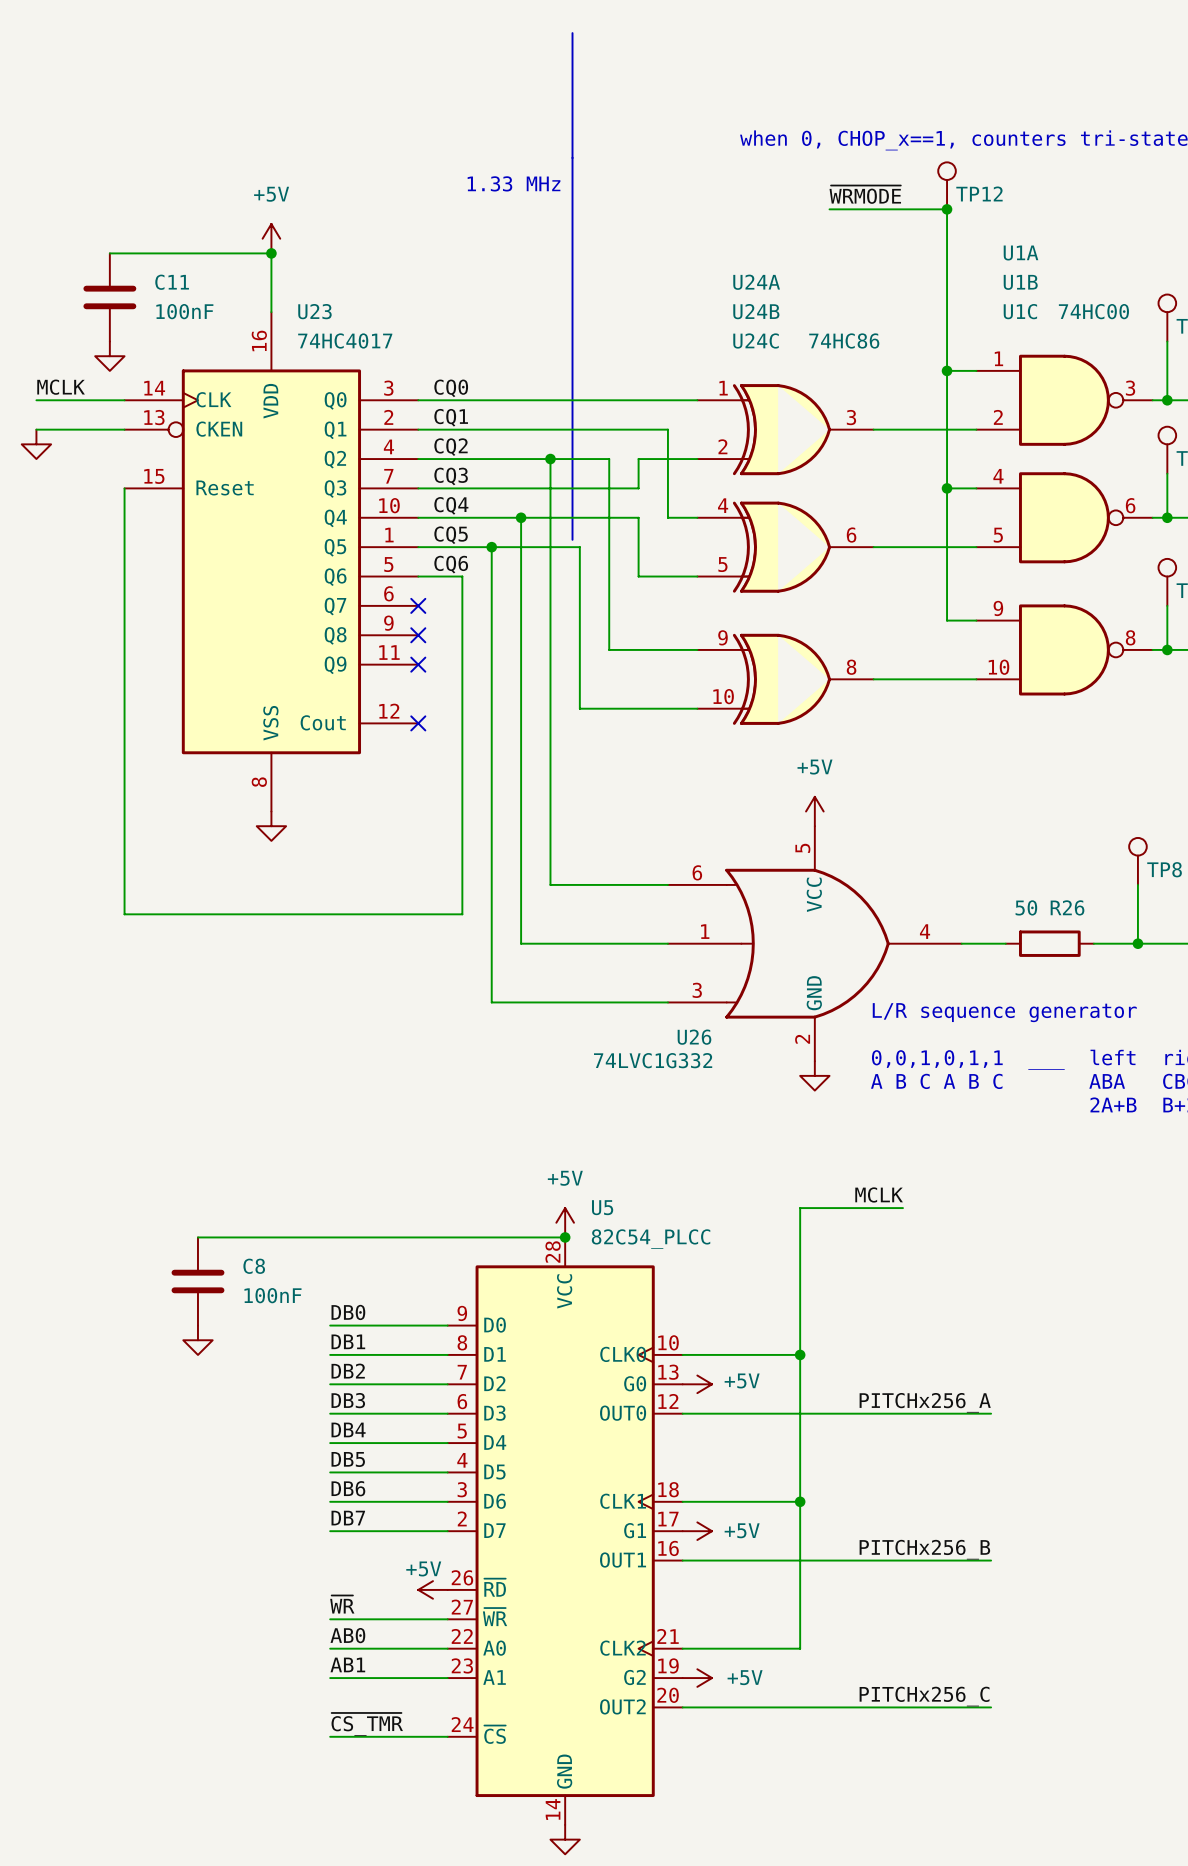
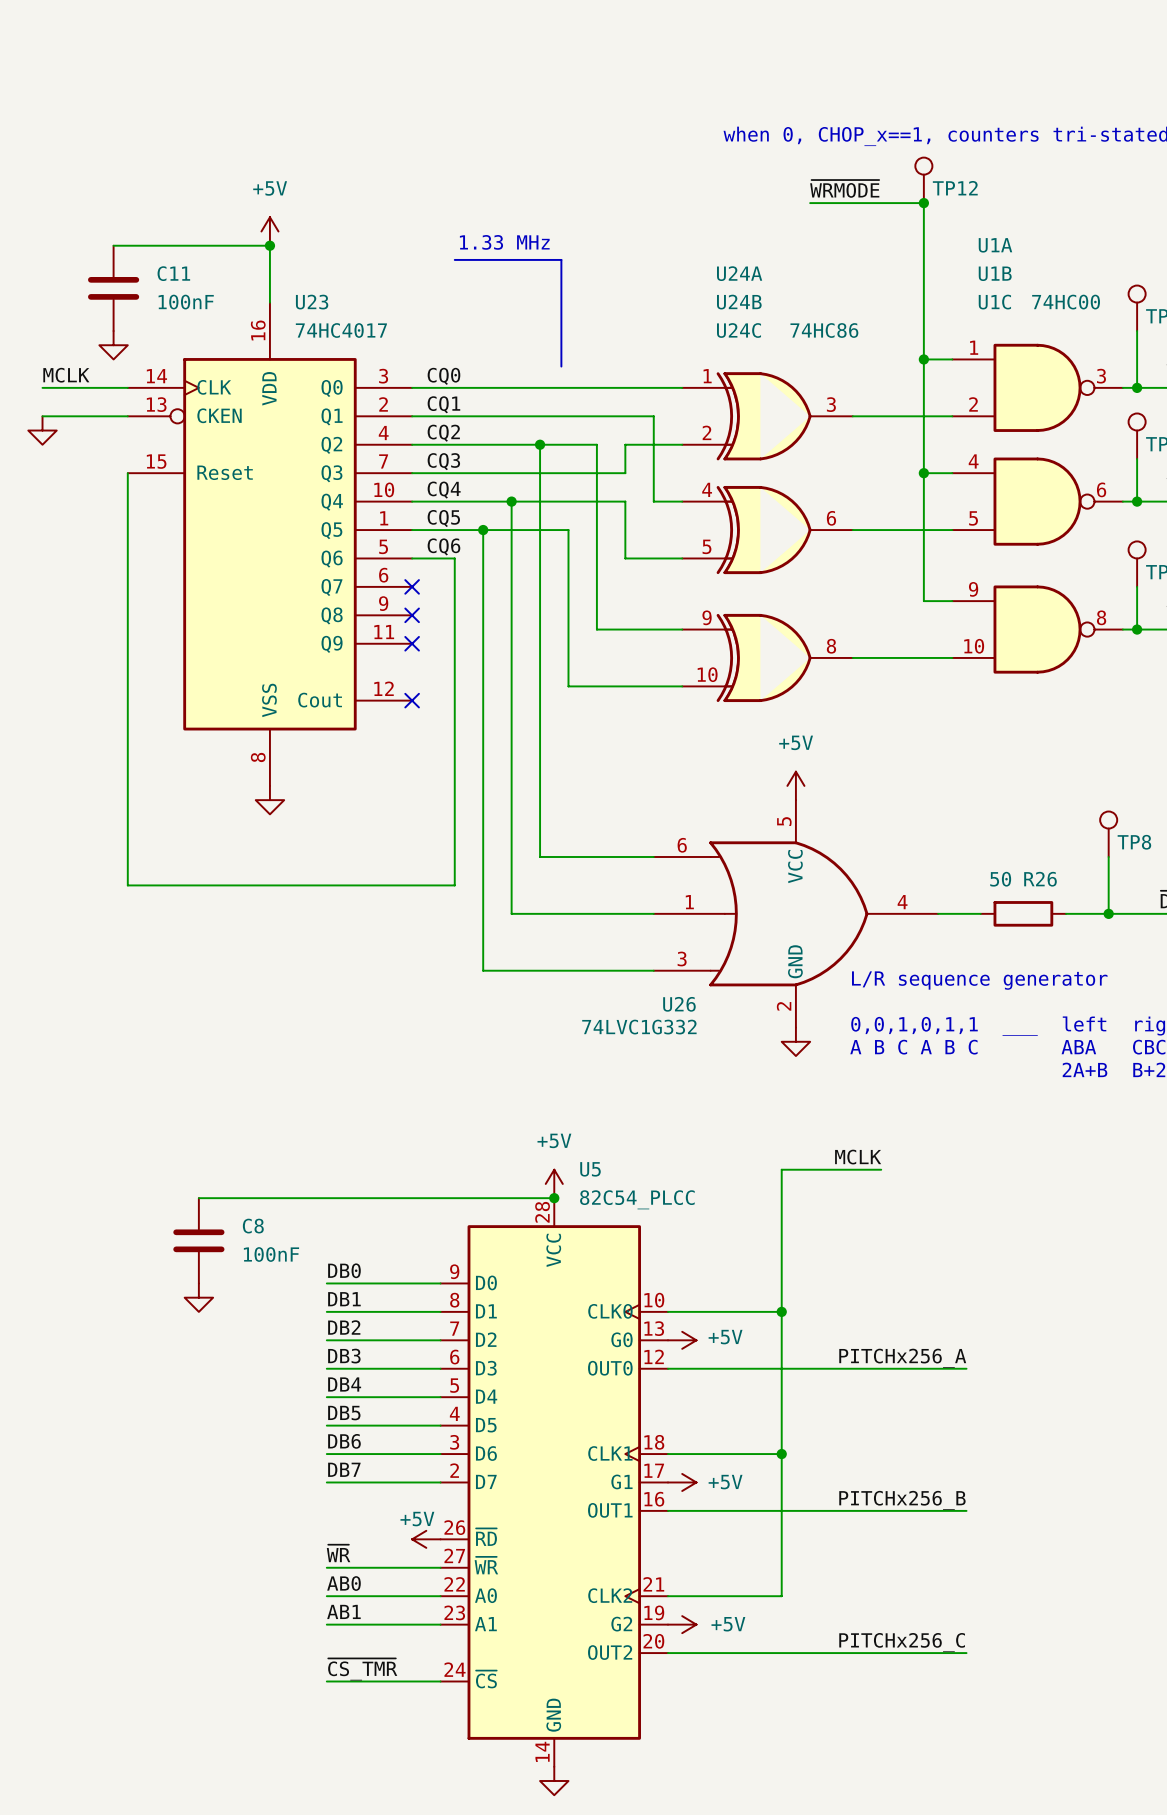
line: (572, 33) (572, 268) -> (454, 259) (561, 259)
text position: 1.33 MHz (514, 183) -> 1.33 MHz (504, 242)
line: (572, 378) (572, 539) -> none

